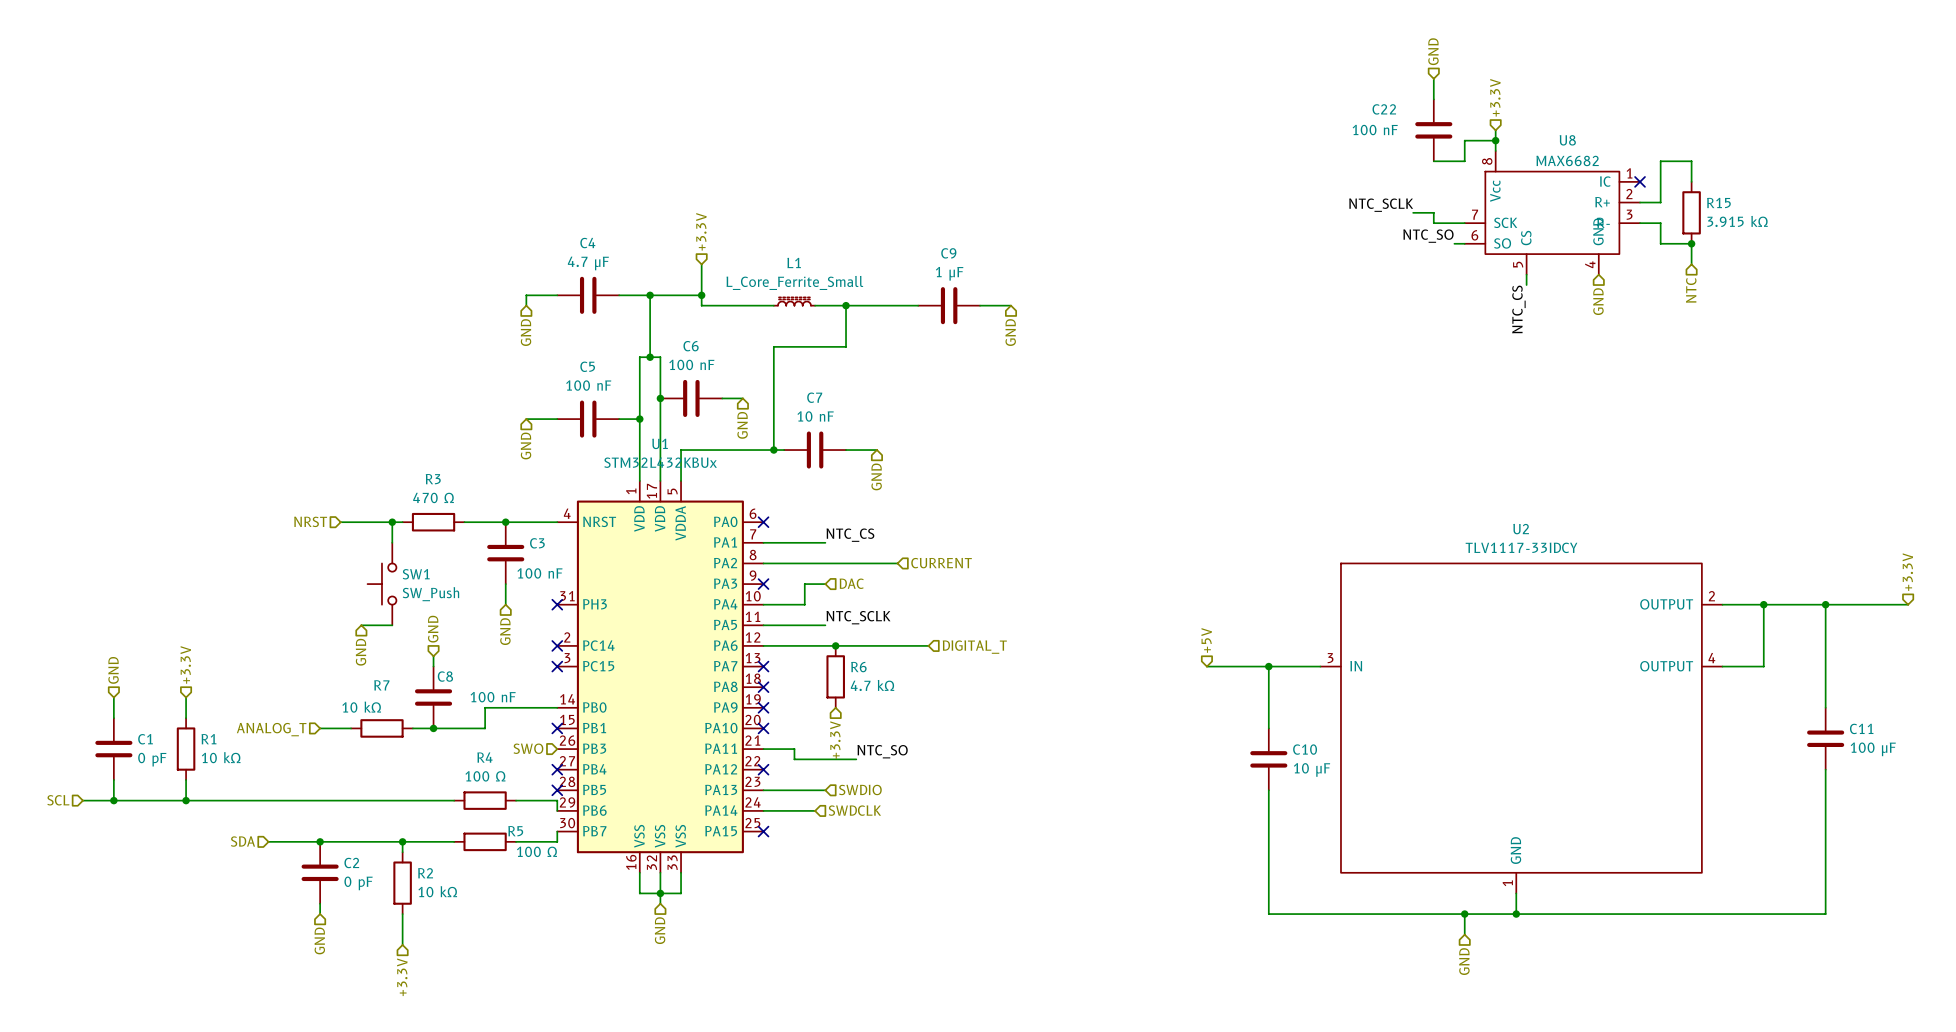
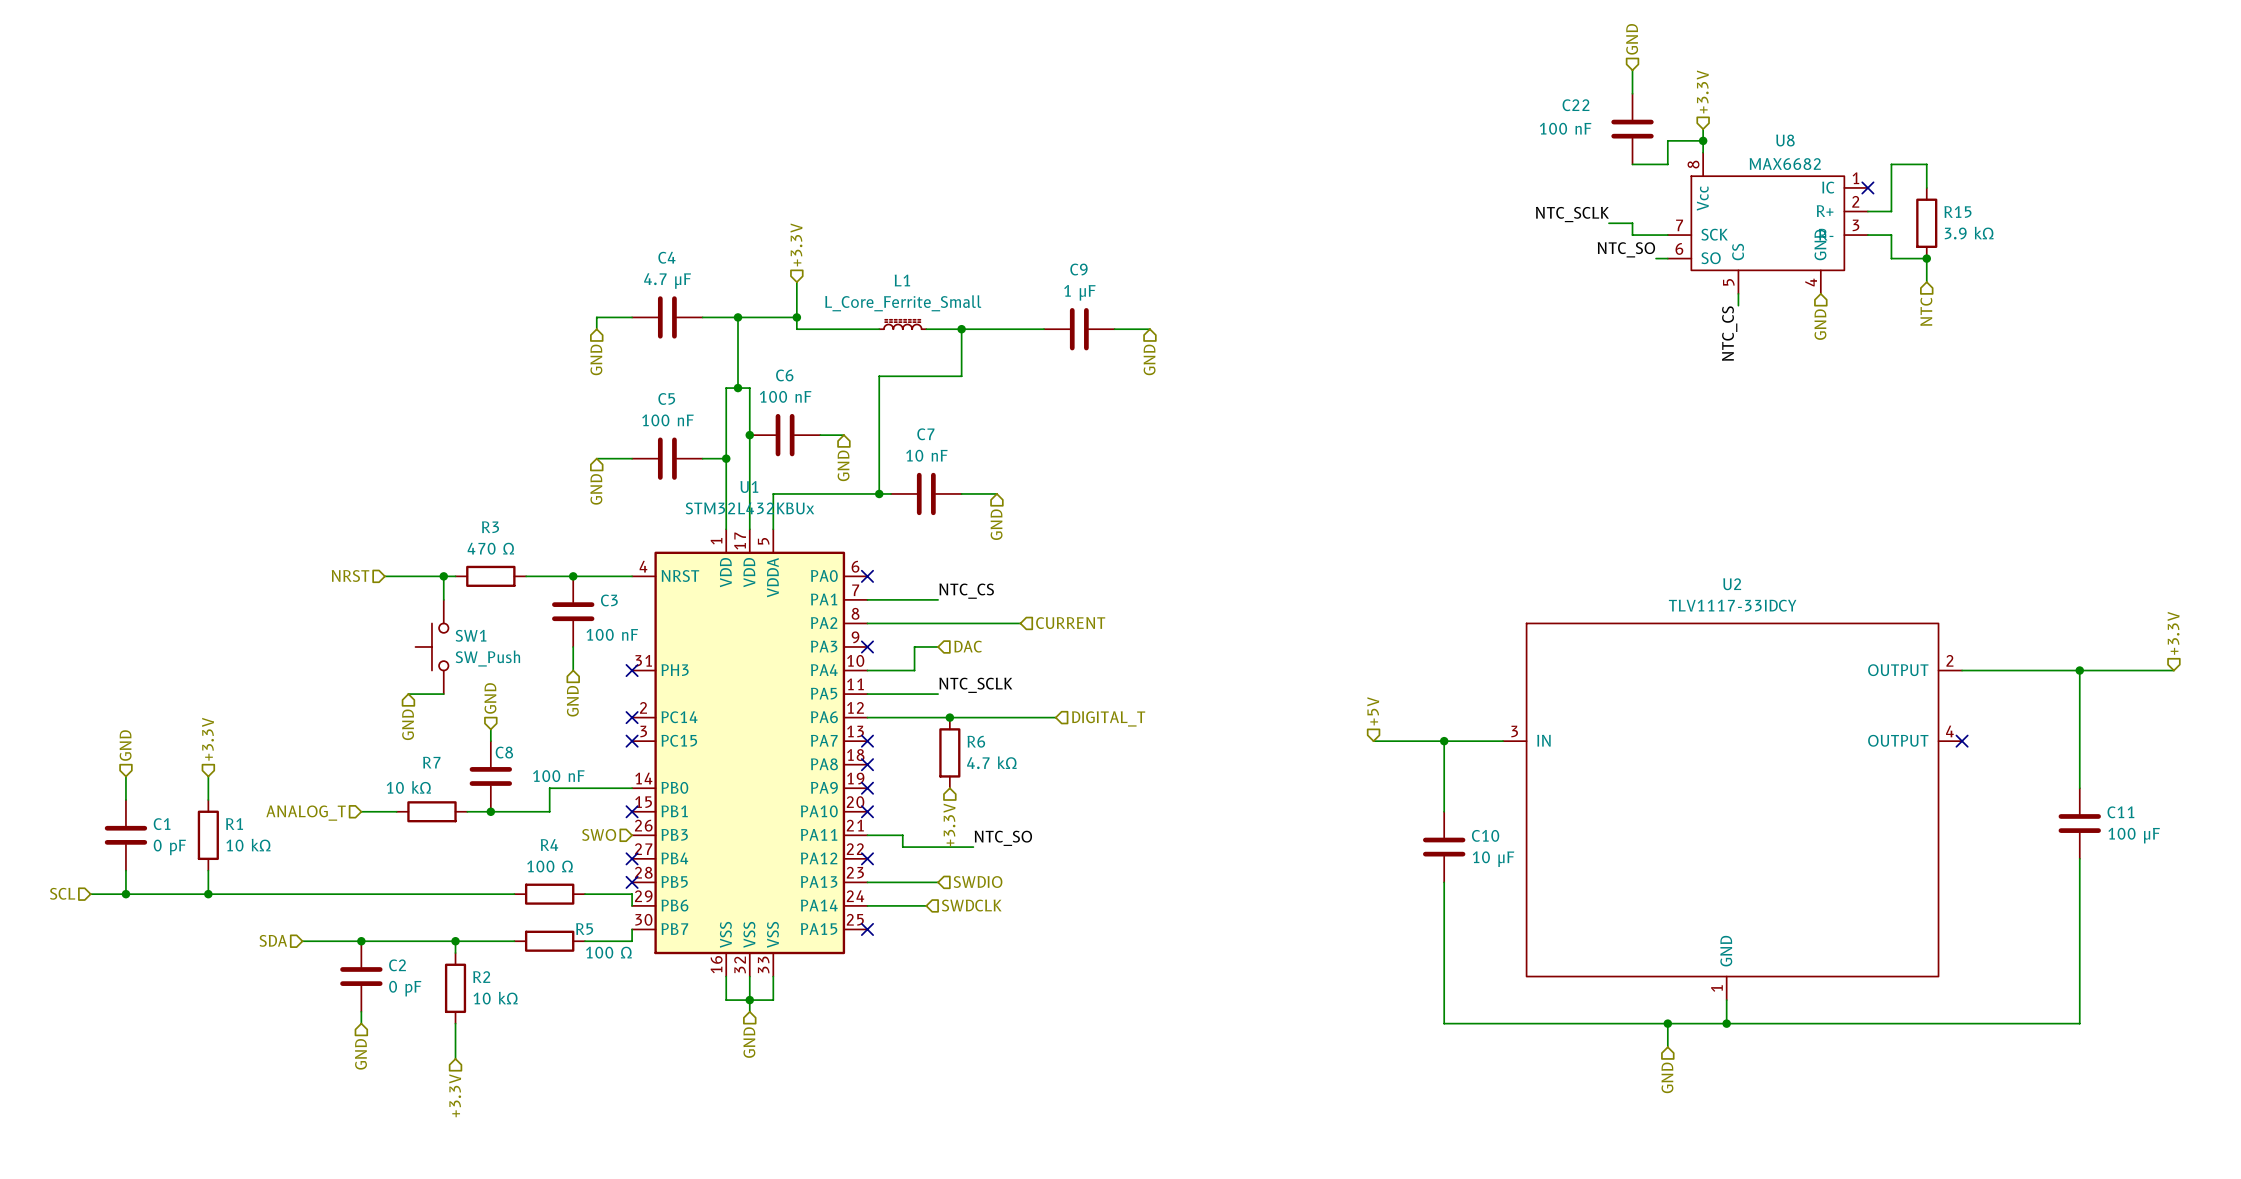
R15 value: 3.915 kΩ (1737, 221) -> 3.9 kΩ (1969, 233)
wire: (1763, 604) (1763, 666) (1722, 666) -> none
junction: (1763, 604) -> none
no-connect mark: none -> (1962, 741)

